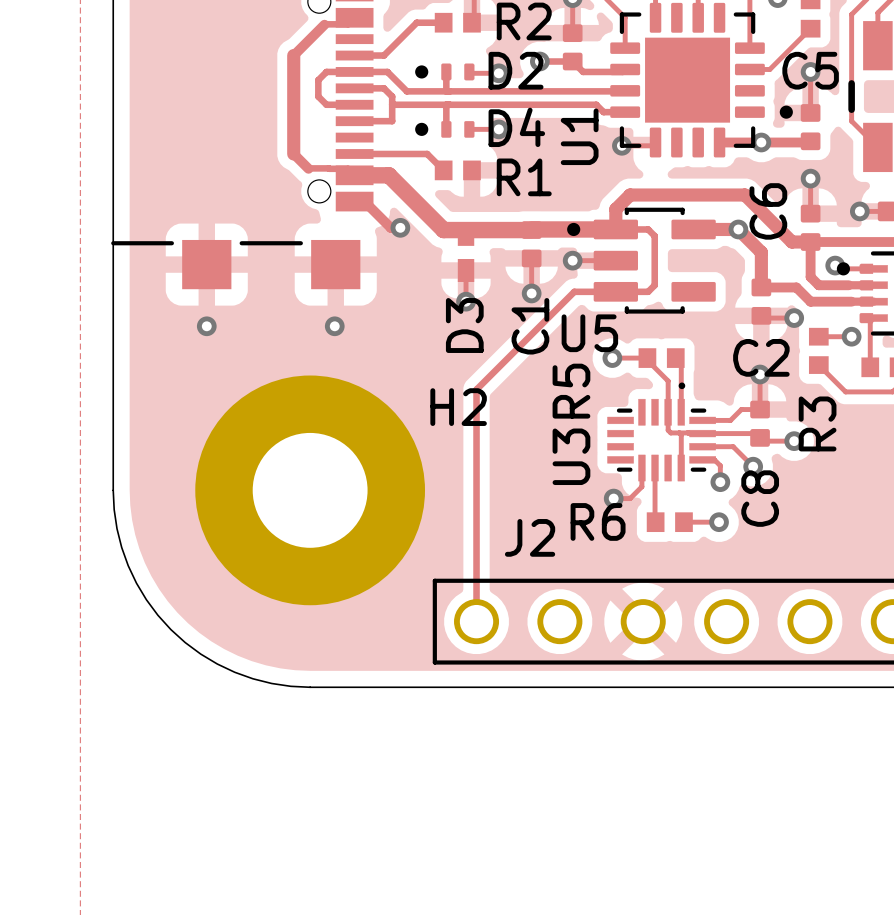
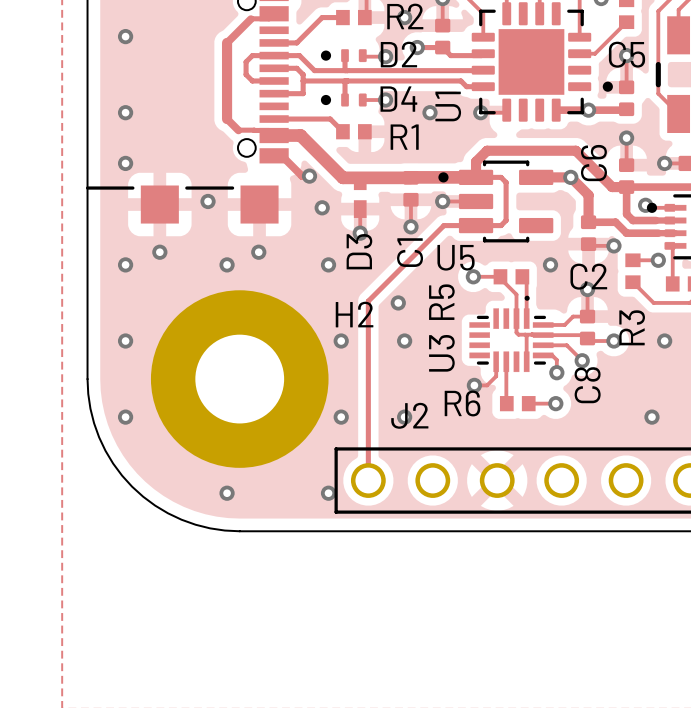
via: none -> (404, 17)
via: none -> (125, 36)
via: none -> (125, 112)
via: none -> (430, 112)
via: none -> (125, 163)
via: none -> (208, 201)
via: none -> (322, 207)
via: none -> (125, 264)
via: none -> (227, 264)
via: none -> (328, 264)
via: none -> (550, 264)
via: none -> (398, 302)
via: none -> (125, 341)
via: none -> (341, 341)
via: none -> (404, 341)
via: none -> (664, 341)
via: none -> (125, 417)
via: none -> (341, 417)
via: none -> (404, 417)
via: none -> (651, 417)
via: none -> (227, 493)
via: none -> (328, 493)

